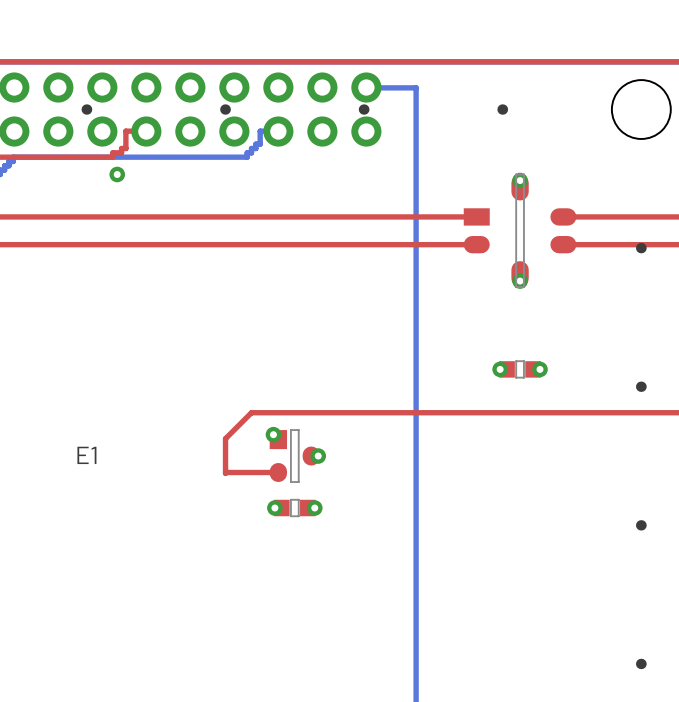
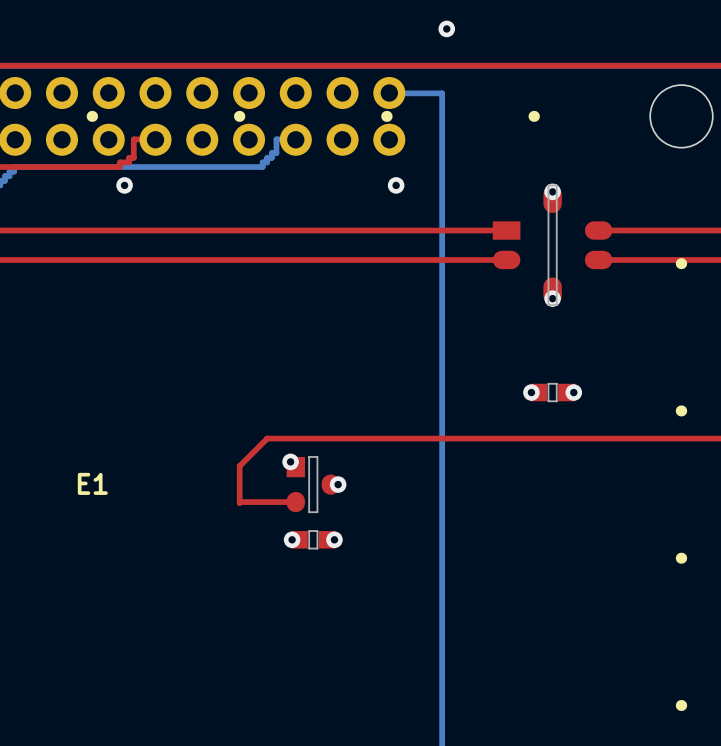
via: none -> (446, 28)
via: none -> (396, 185)

